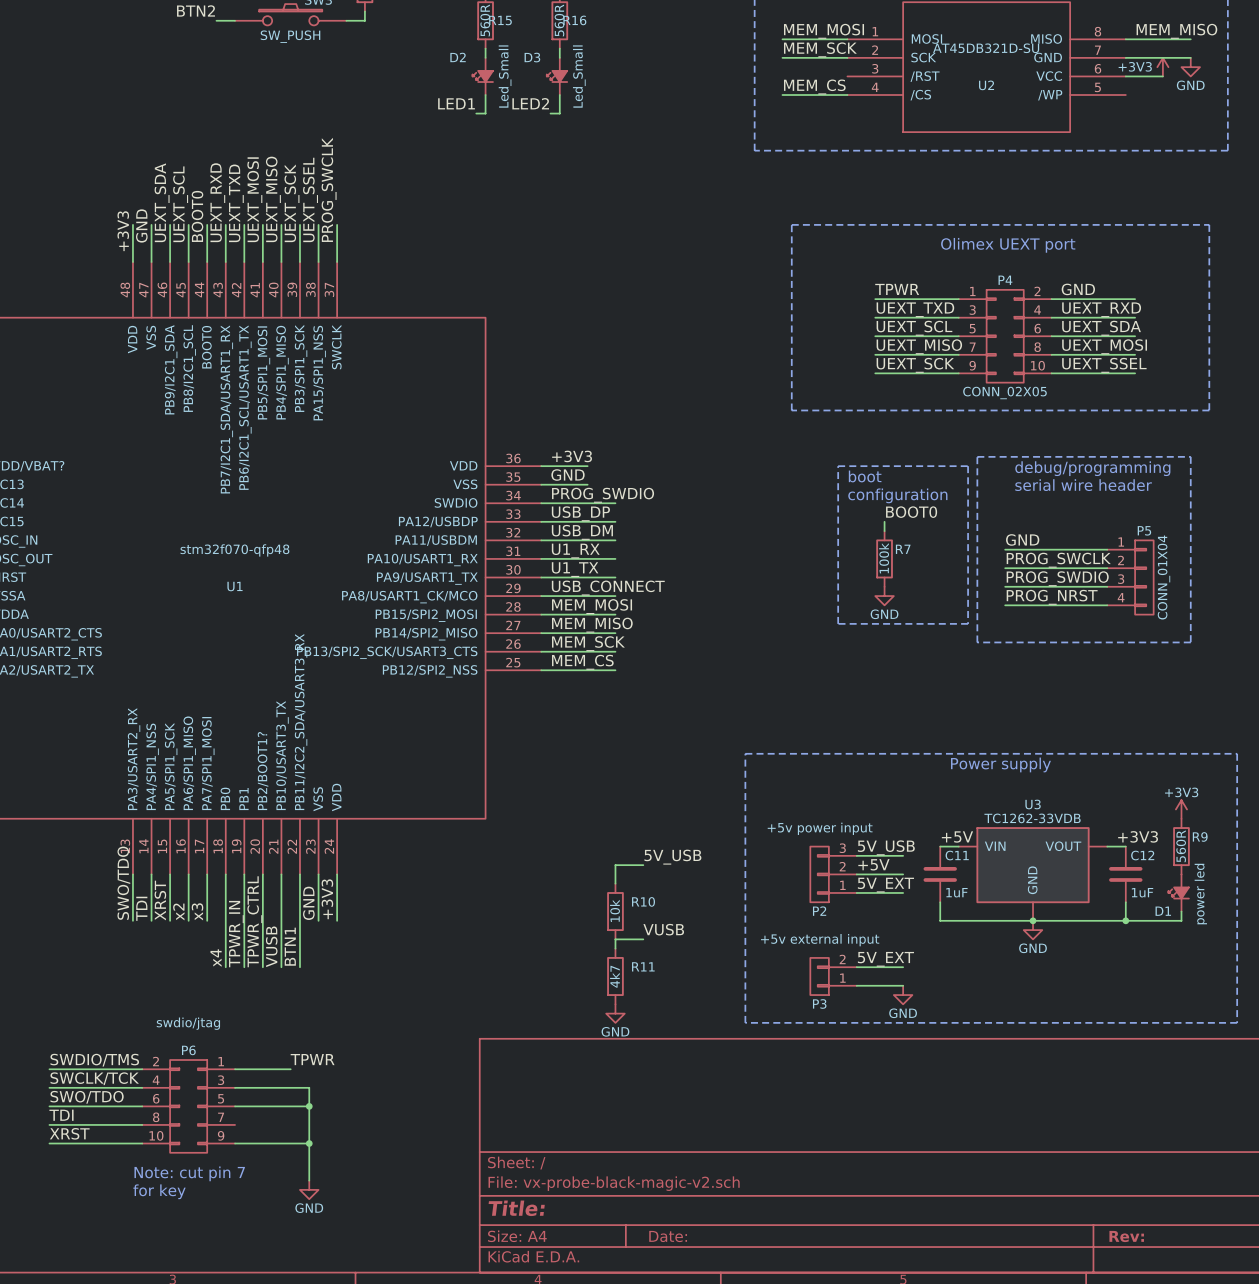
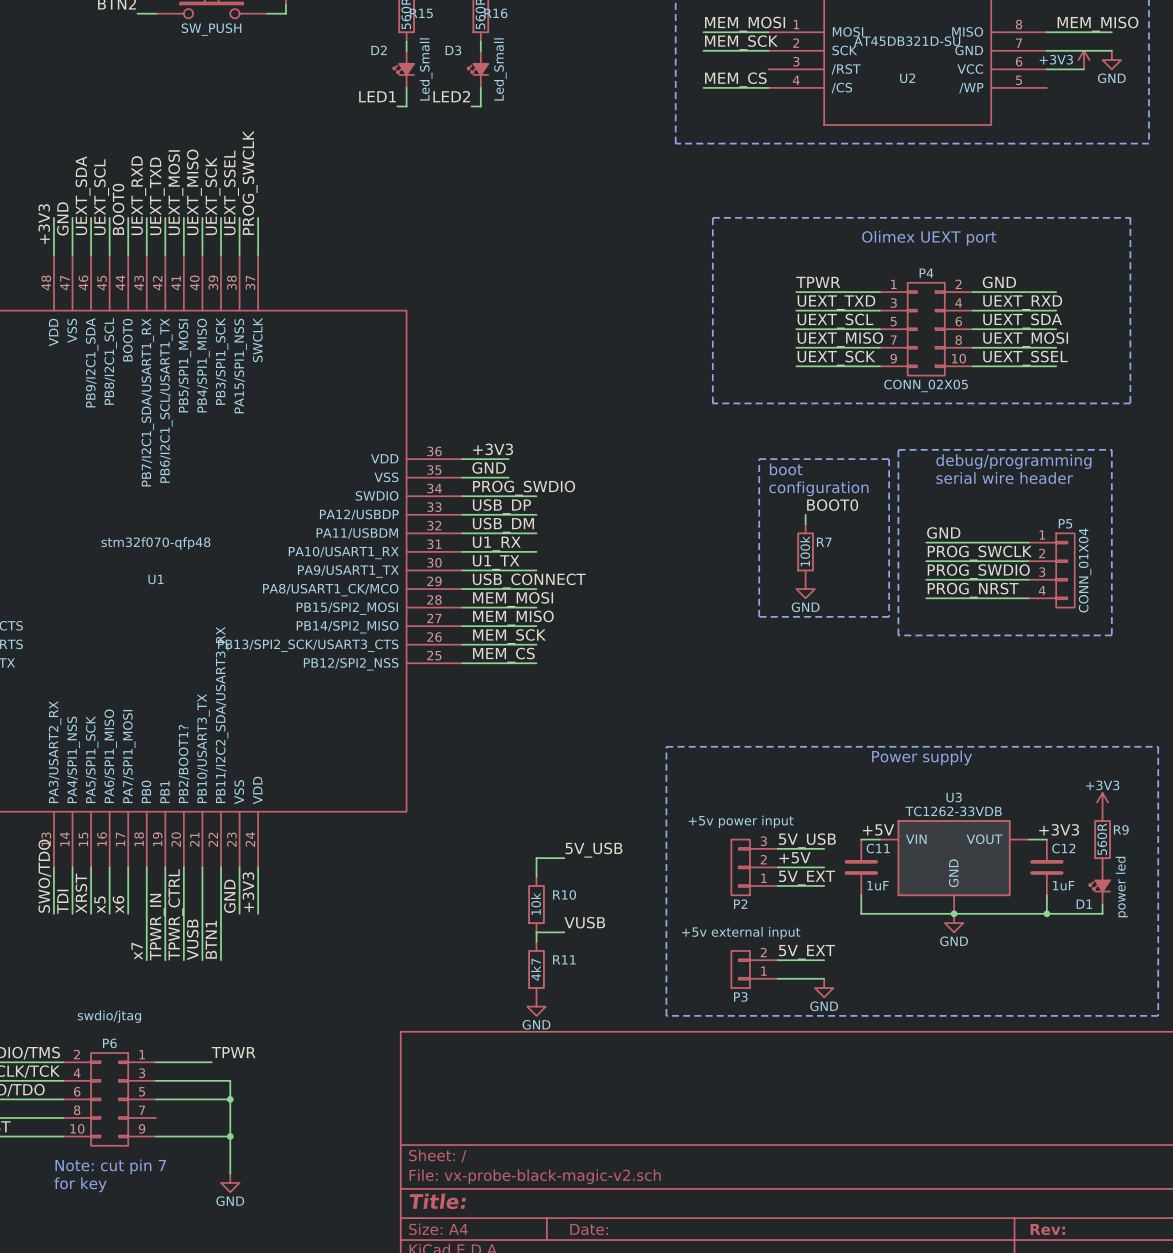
label: x2 (178, 911) -> x5 (100, 904)
label: x3 (197, 911) -> x6 (118, 904)
label: x4 (216, 958) -> x7 (137, 951)

